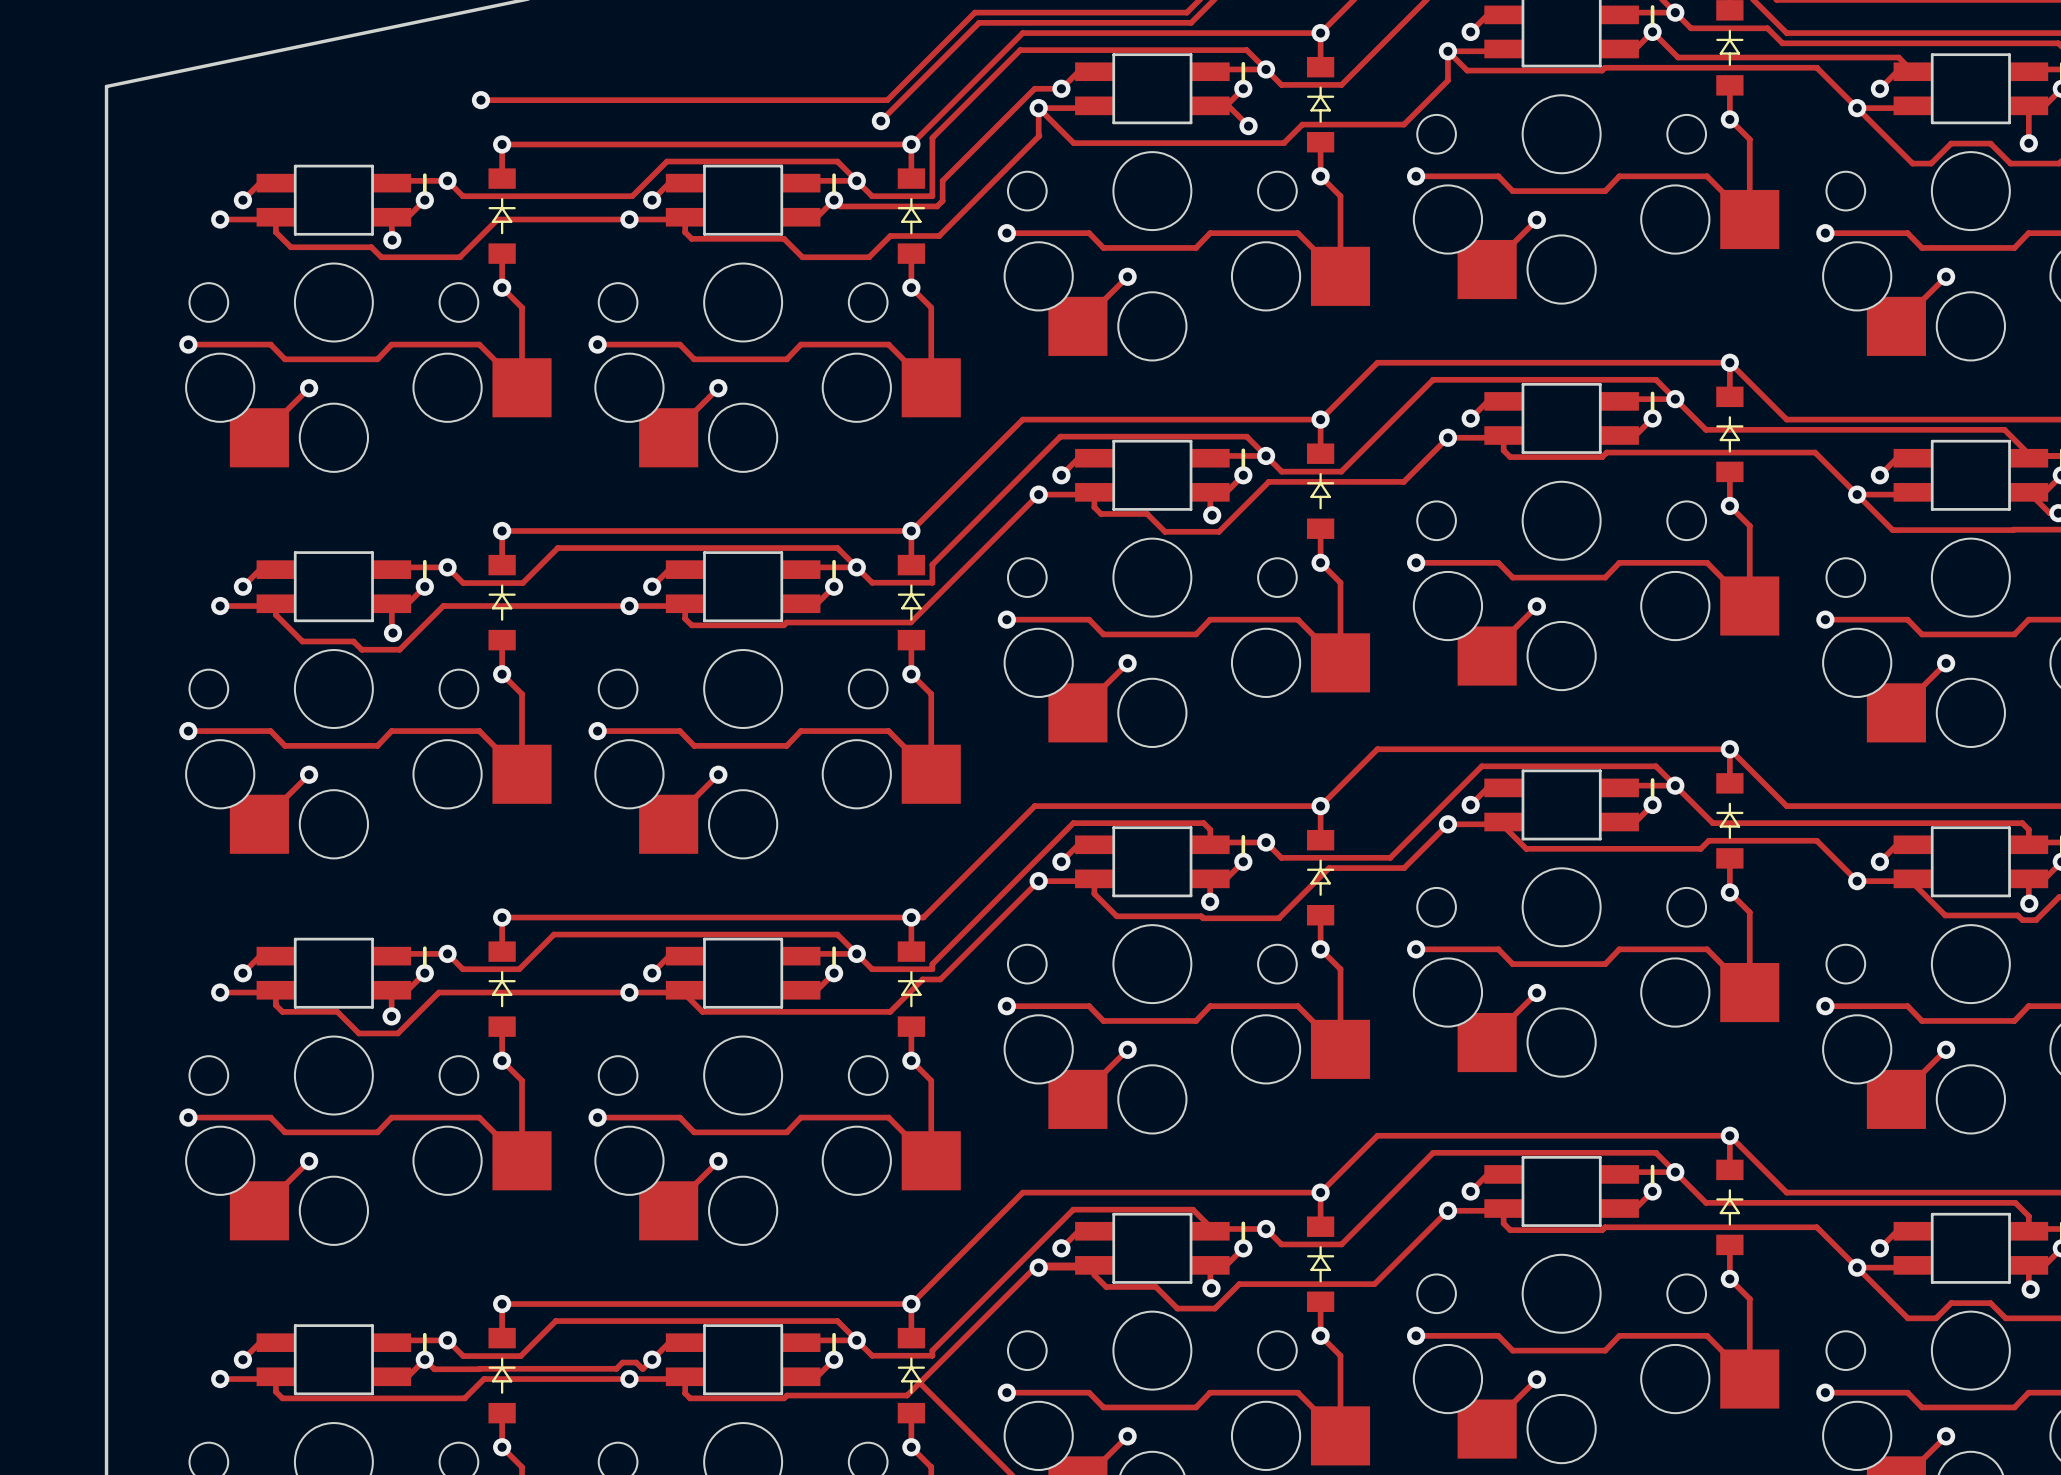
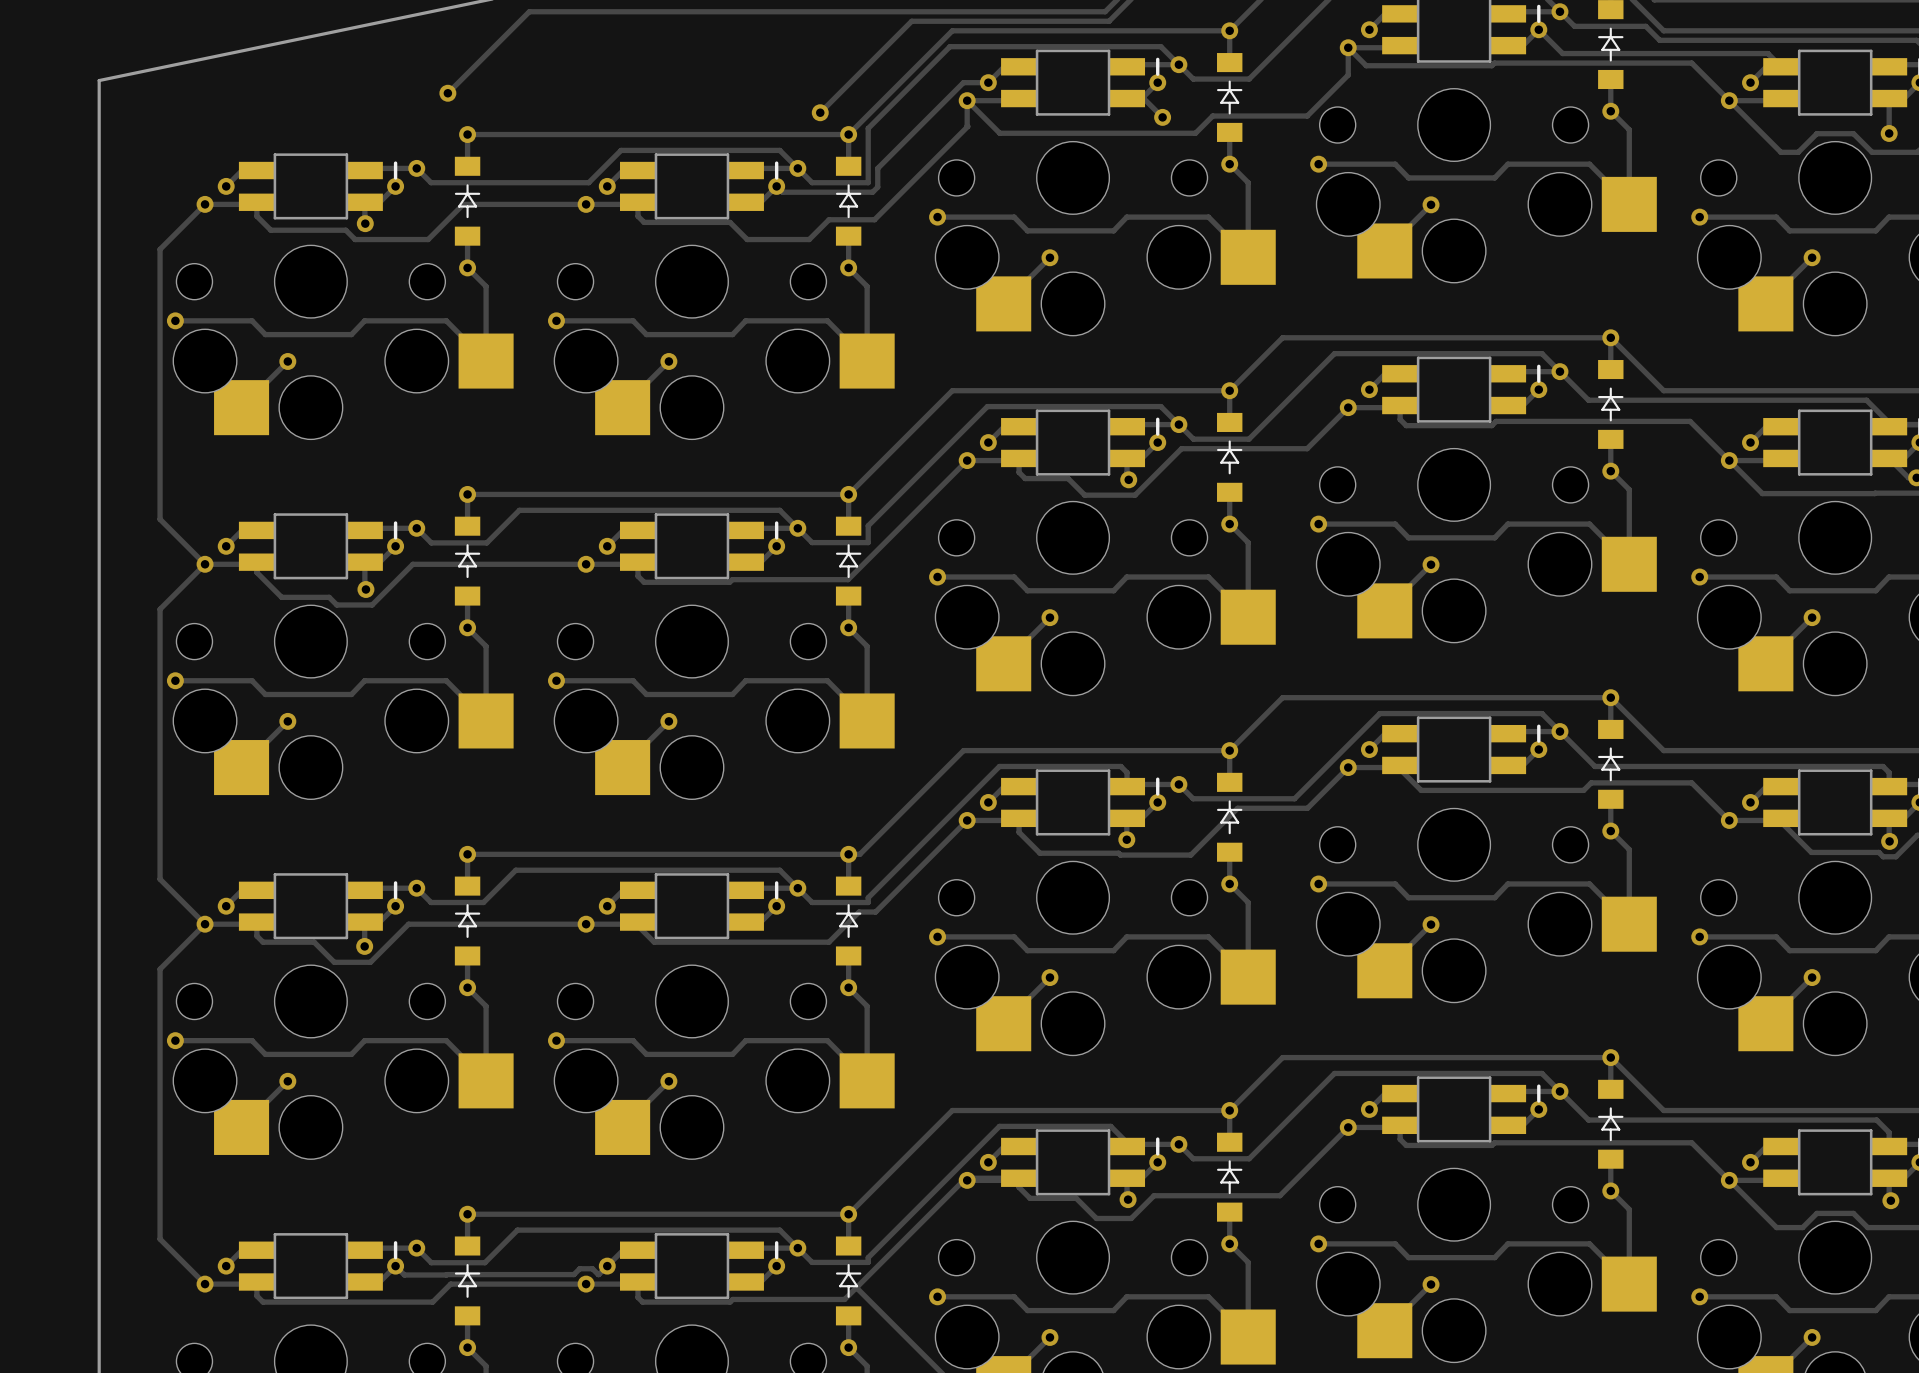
track: (974, 12) (887, 100) (480, 100) -> (907, 11) (529, 11) (447, 93)
track: none -> (205, 204) (160, 249) (160, 519) (205, 564) (160, 609) (160, 879) (205, 924) (160, 969) (160, 1239) (205, 1284)

